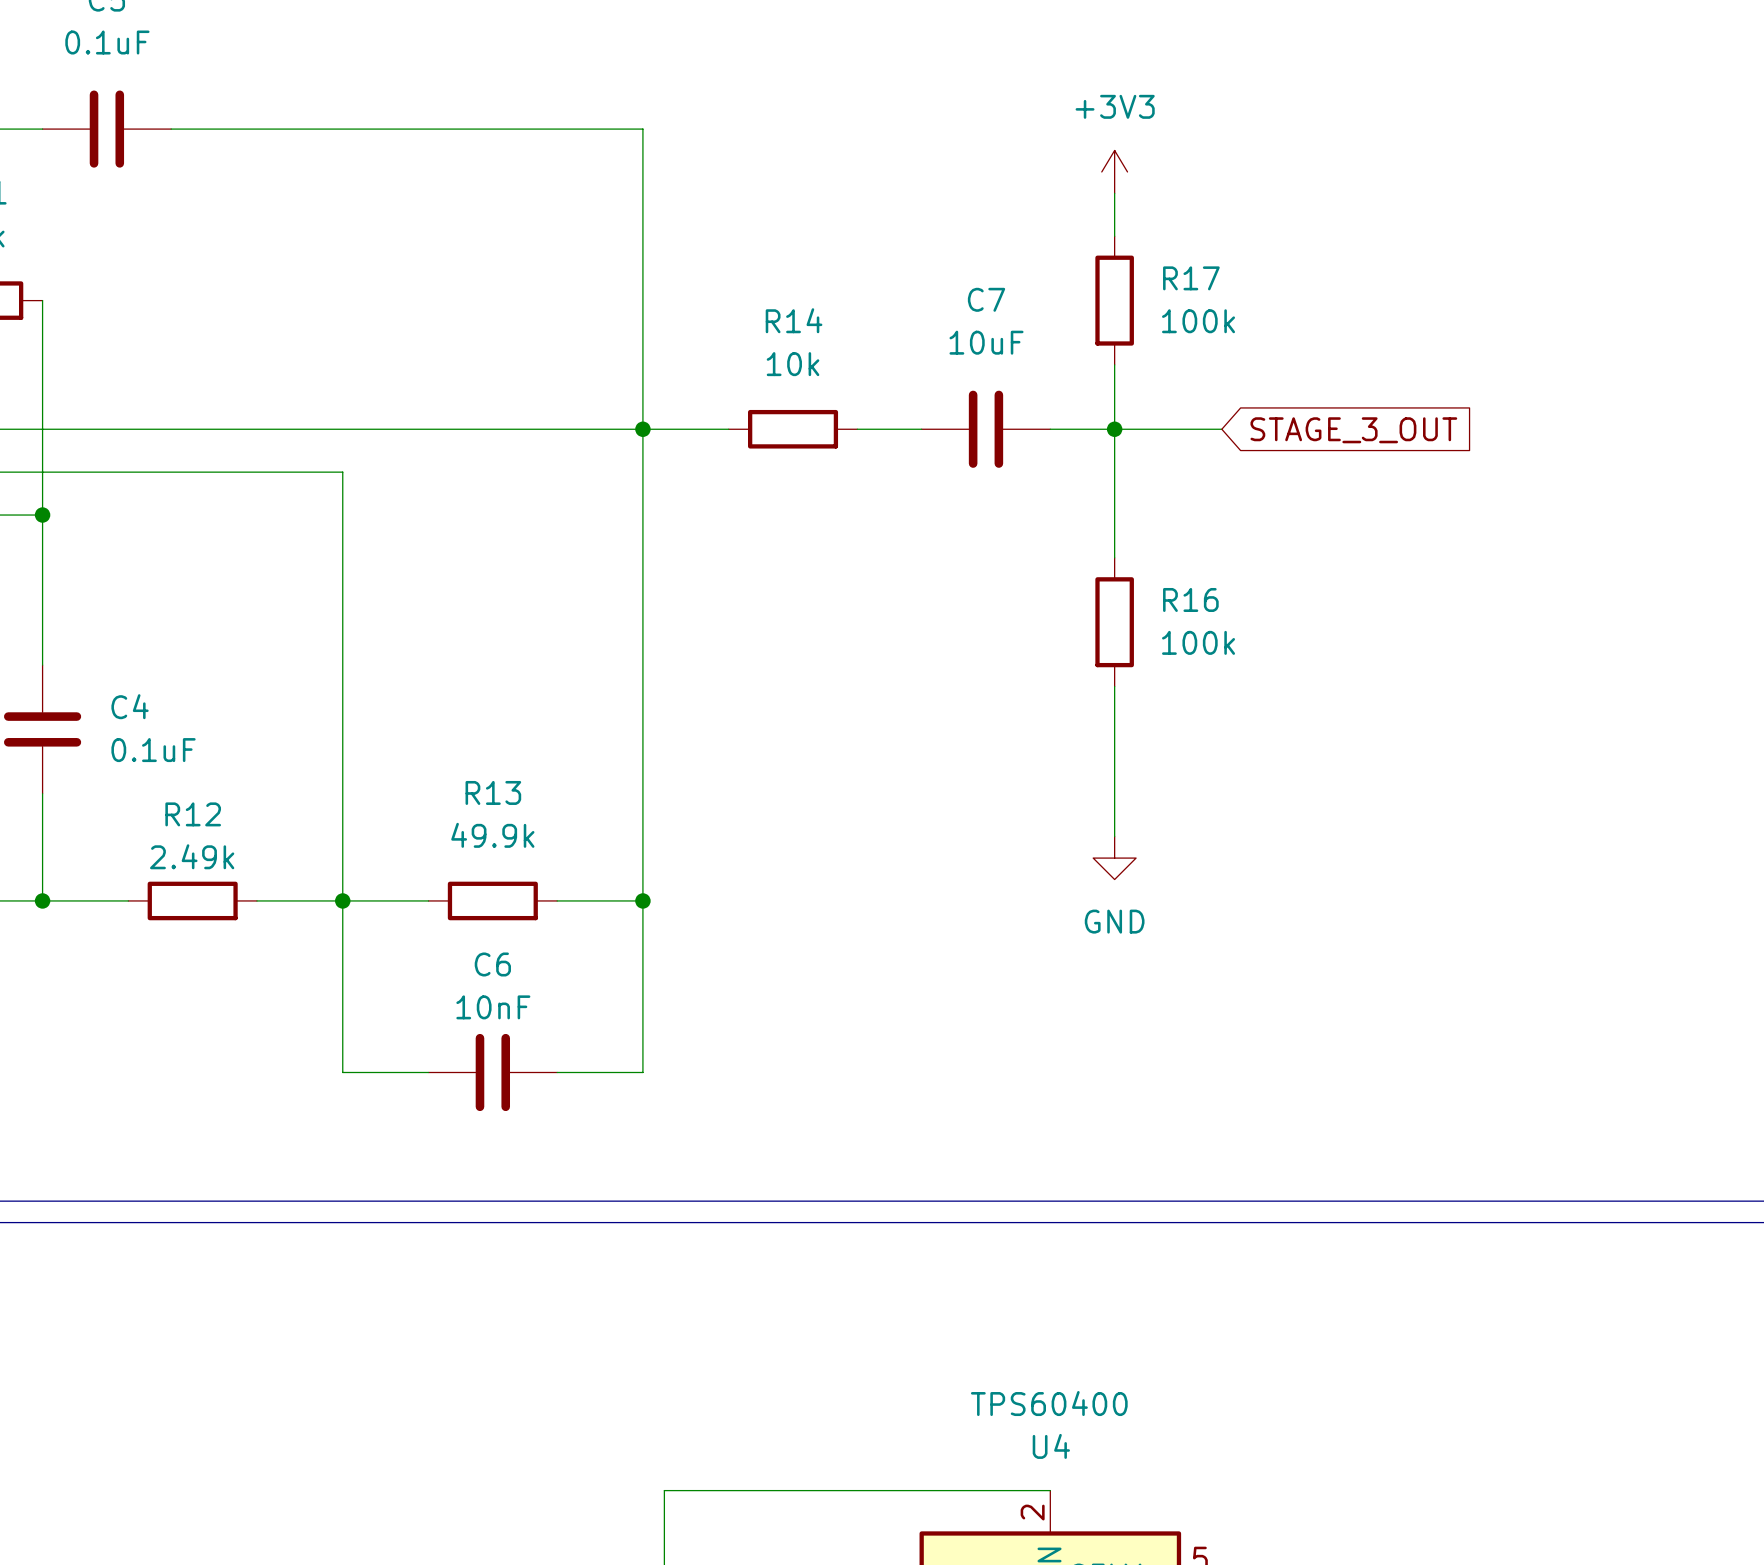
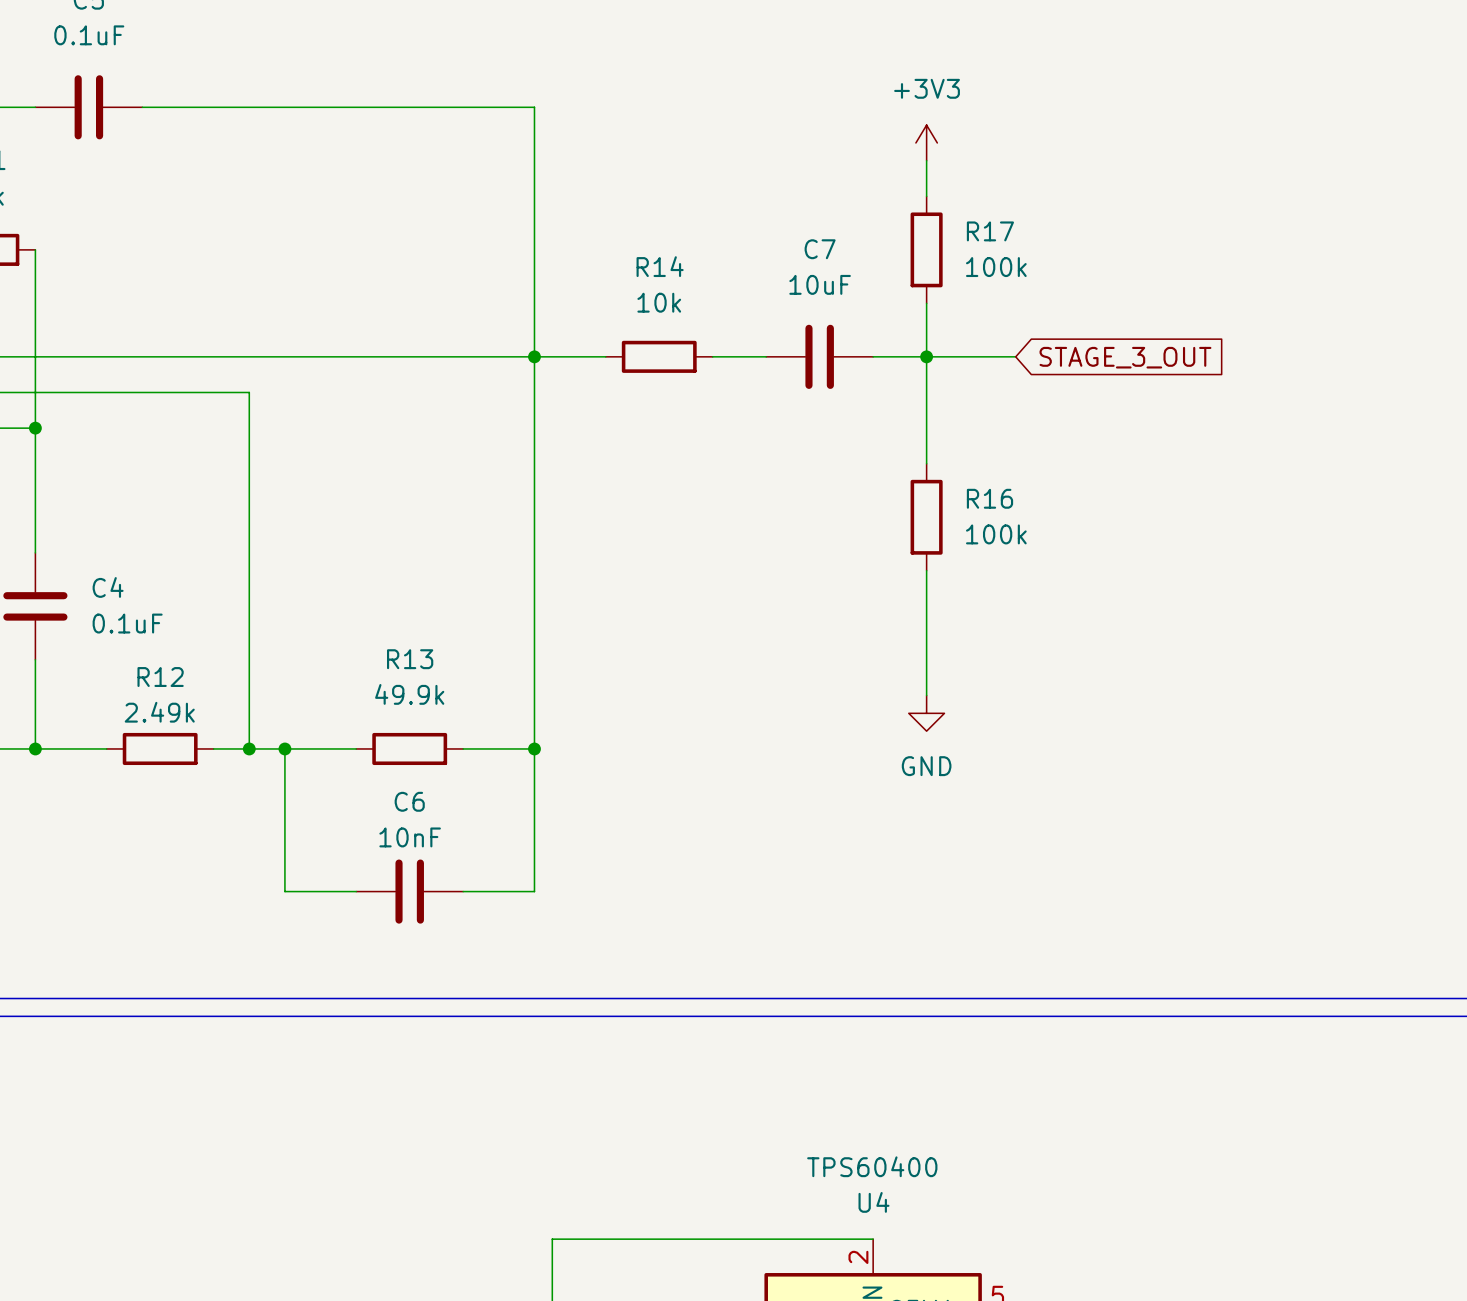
wire: (299, 472) (342, 472) (342, 900) -> (249, 392) (249, 748)
junction: none -> (249, 748)

